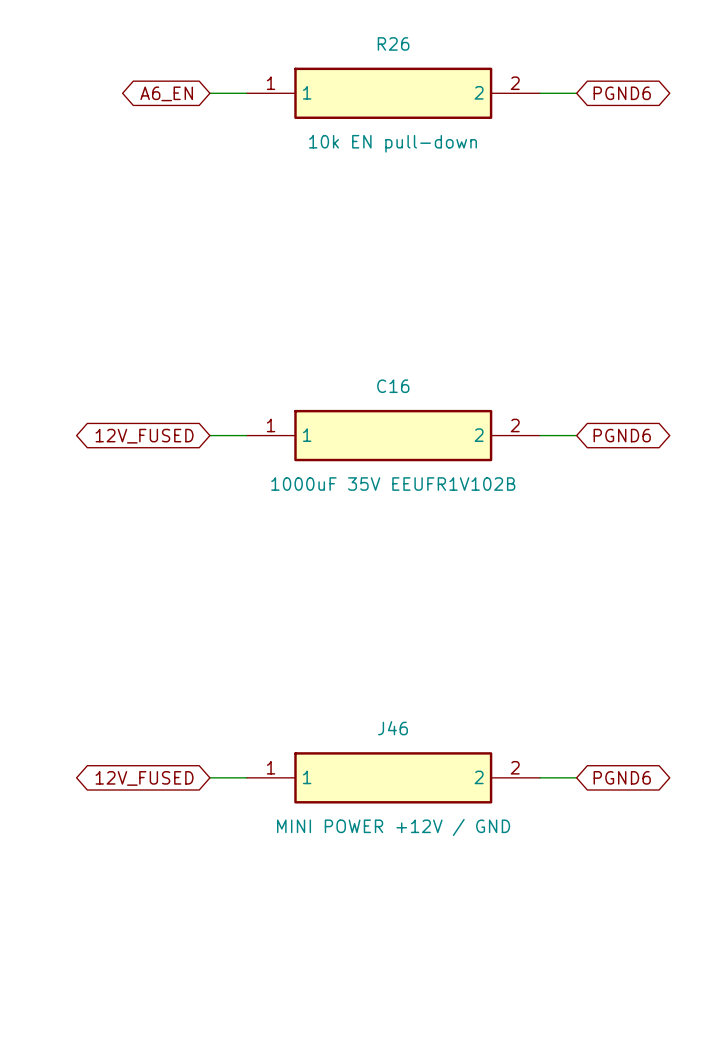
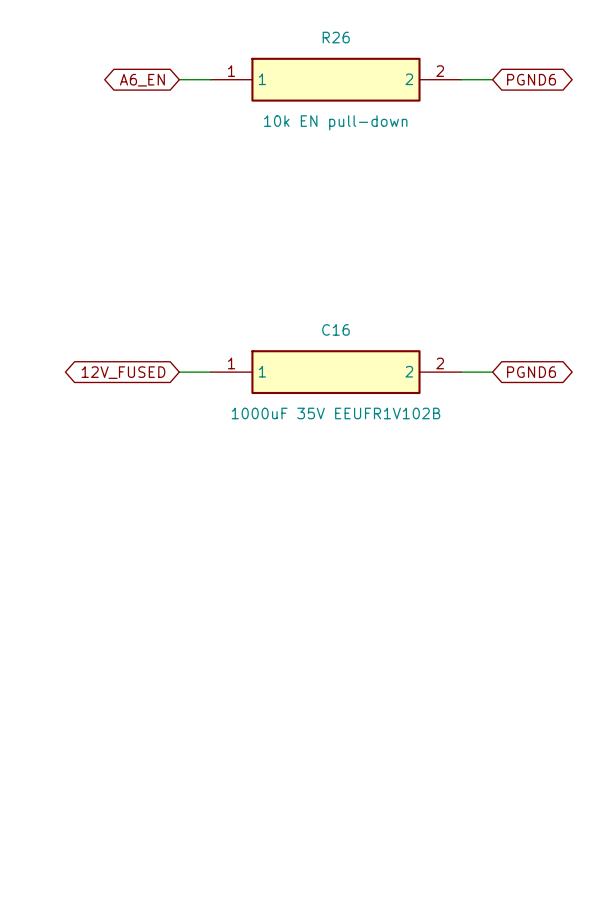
wire: (209, 777) (246, 777) -> none
J46: MINI POWER +12V / GND (393, 777) -> none
wire: (539, 777) (576, 777) -> none
global label: PGND6 (622, 777) -> none
global label: 12V_FUSED (144, 778) -> none

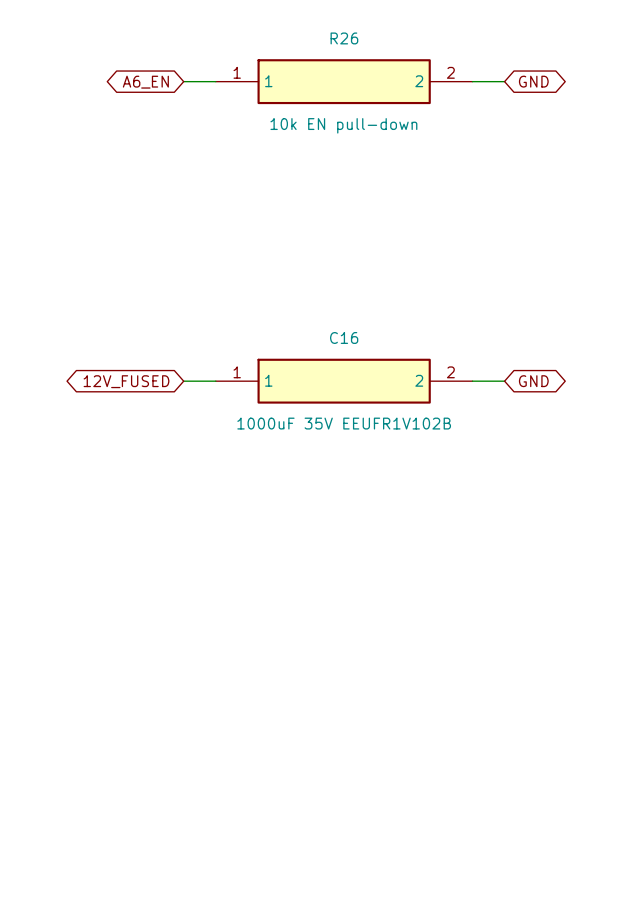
global label: PGND6 (531, 79) -> GND (533, 81)
global label: PGND6 (531, 372) -> GND (533, 381)

